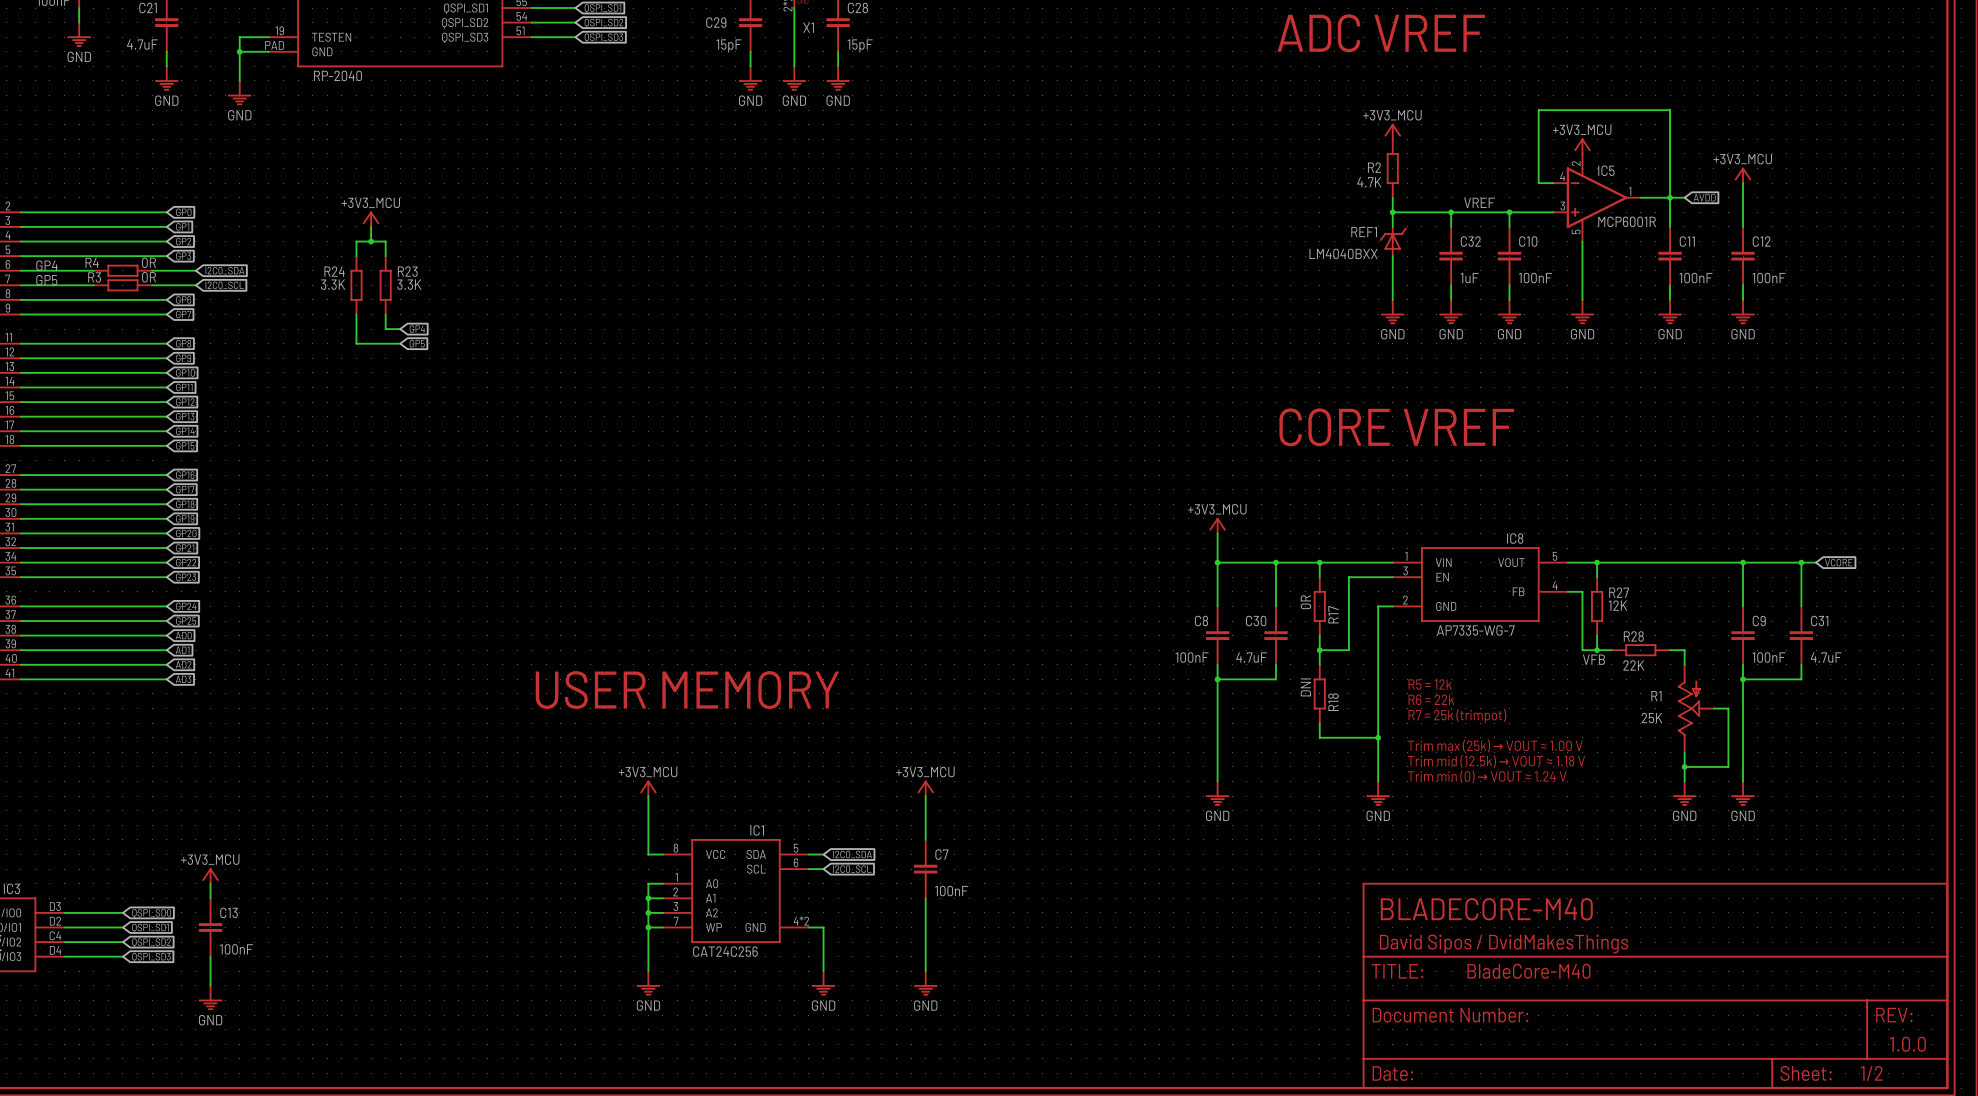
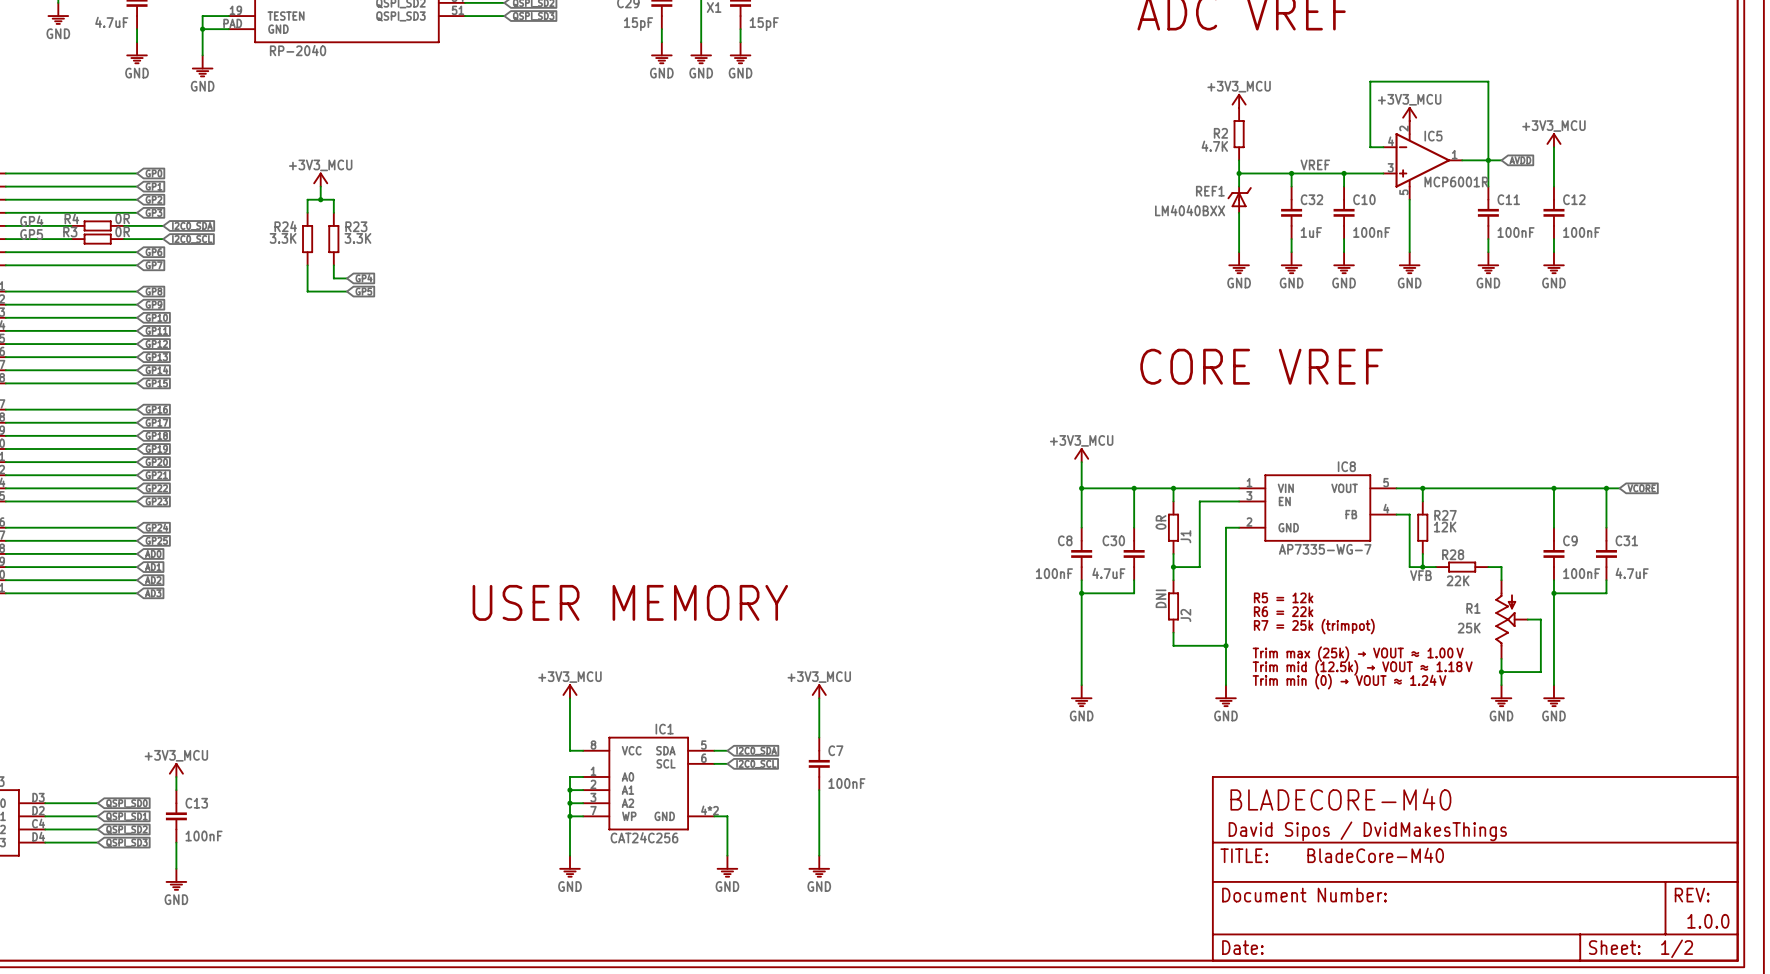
R17 name: R17 (1333, 614) -> J1 (1185, 536)
R18 name: R18 (1333, 702) -> J2 (1185, 615)

